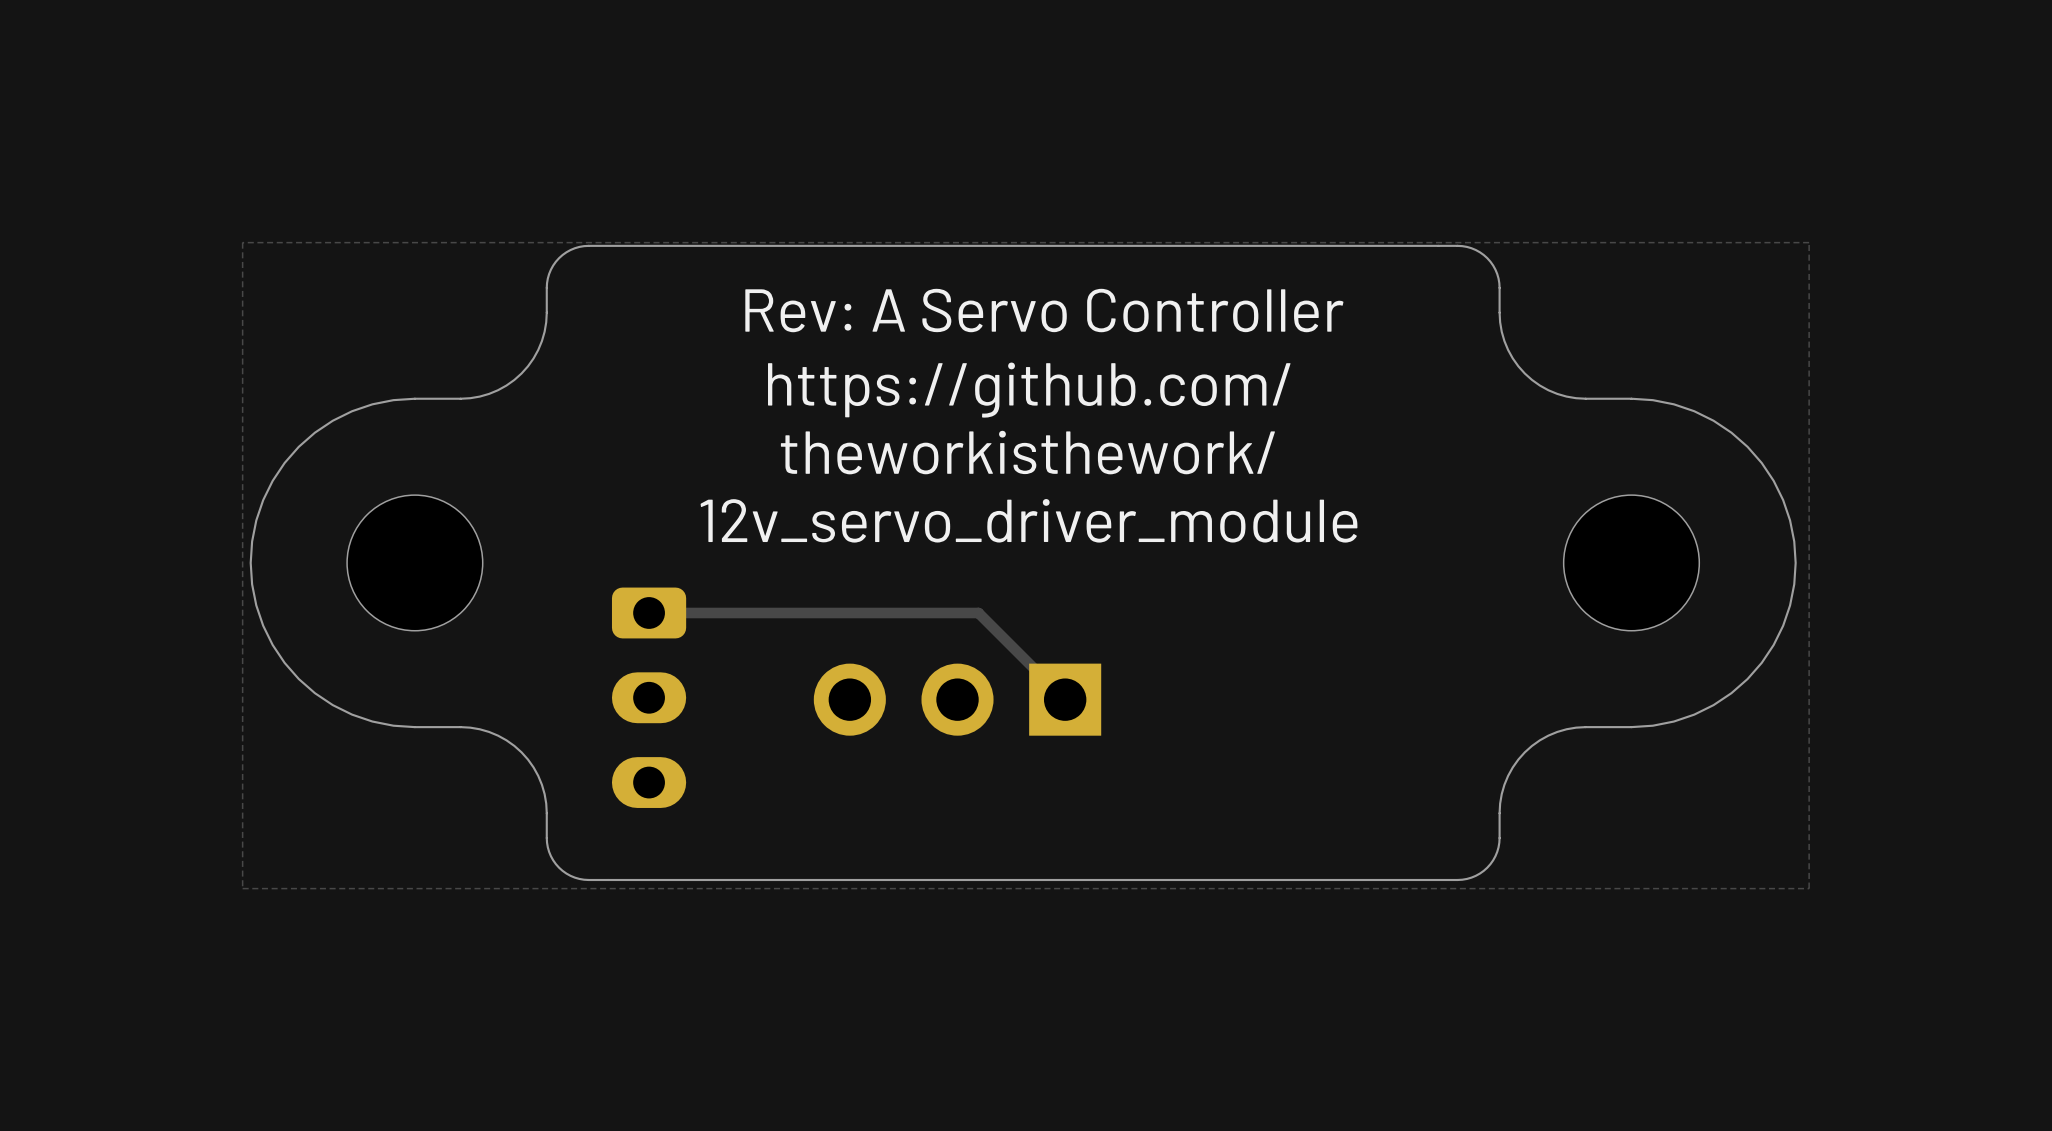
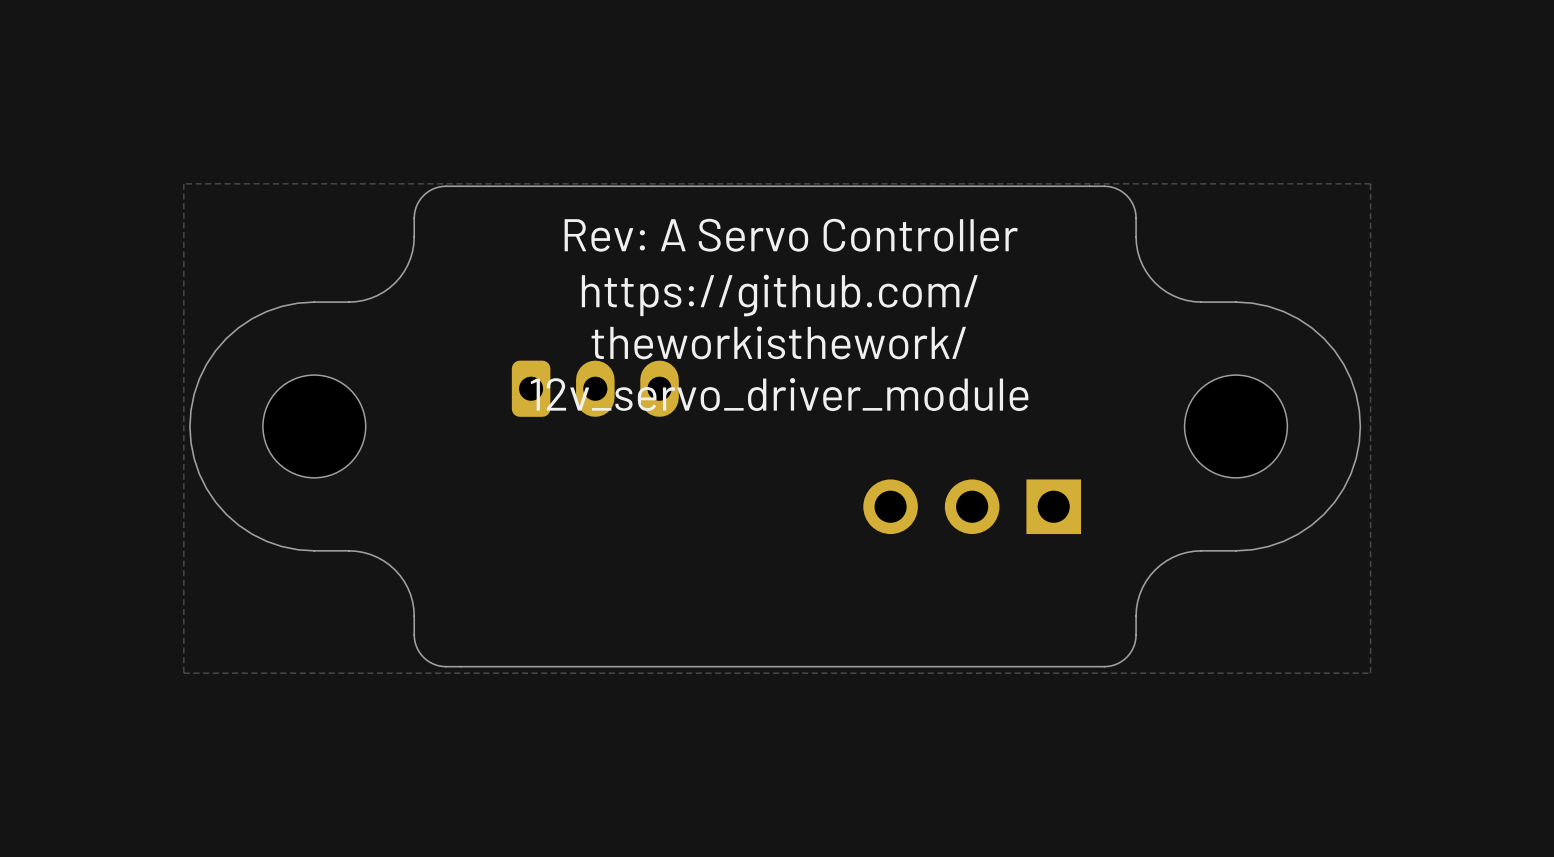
track: (649, 612) (978, 612) (1065, 699) -> none
part rotation: 0° (649, 697) -> 90° counterclockwise (595, 388)
part position: (649, 697) -> (595, 388)
part position: (957, 699) -> (972, 506)

